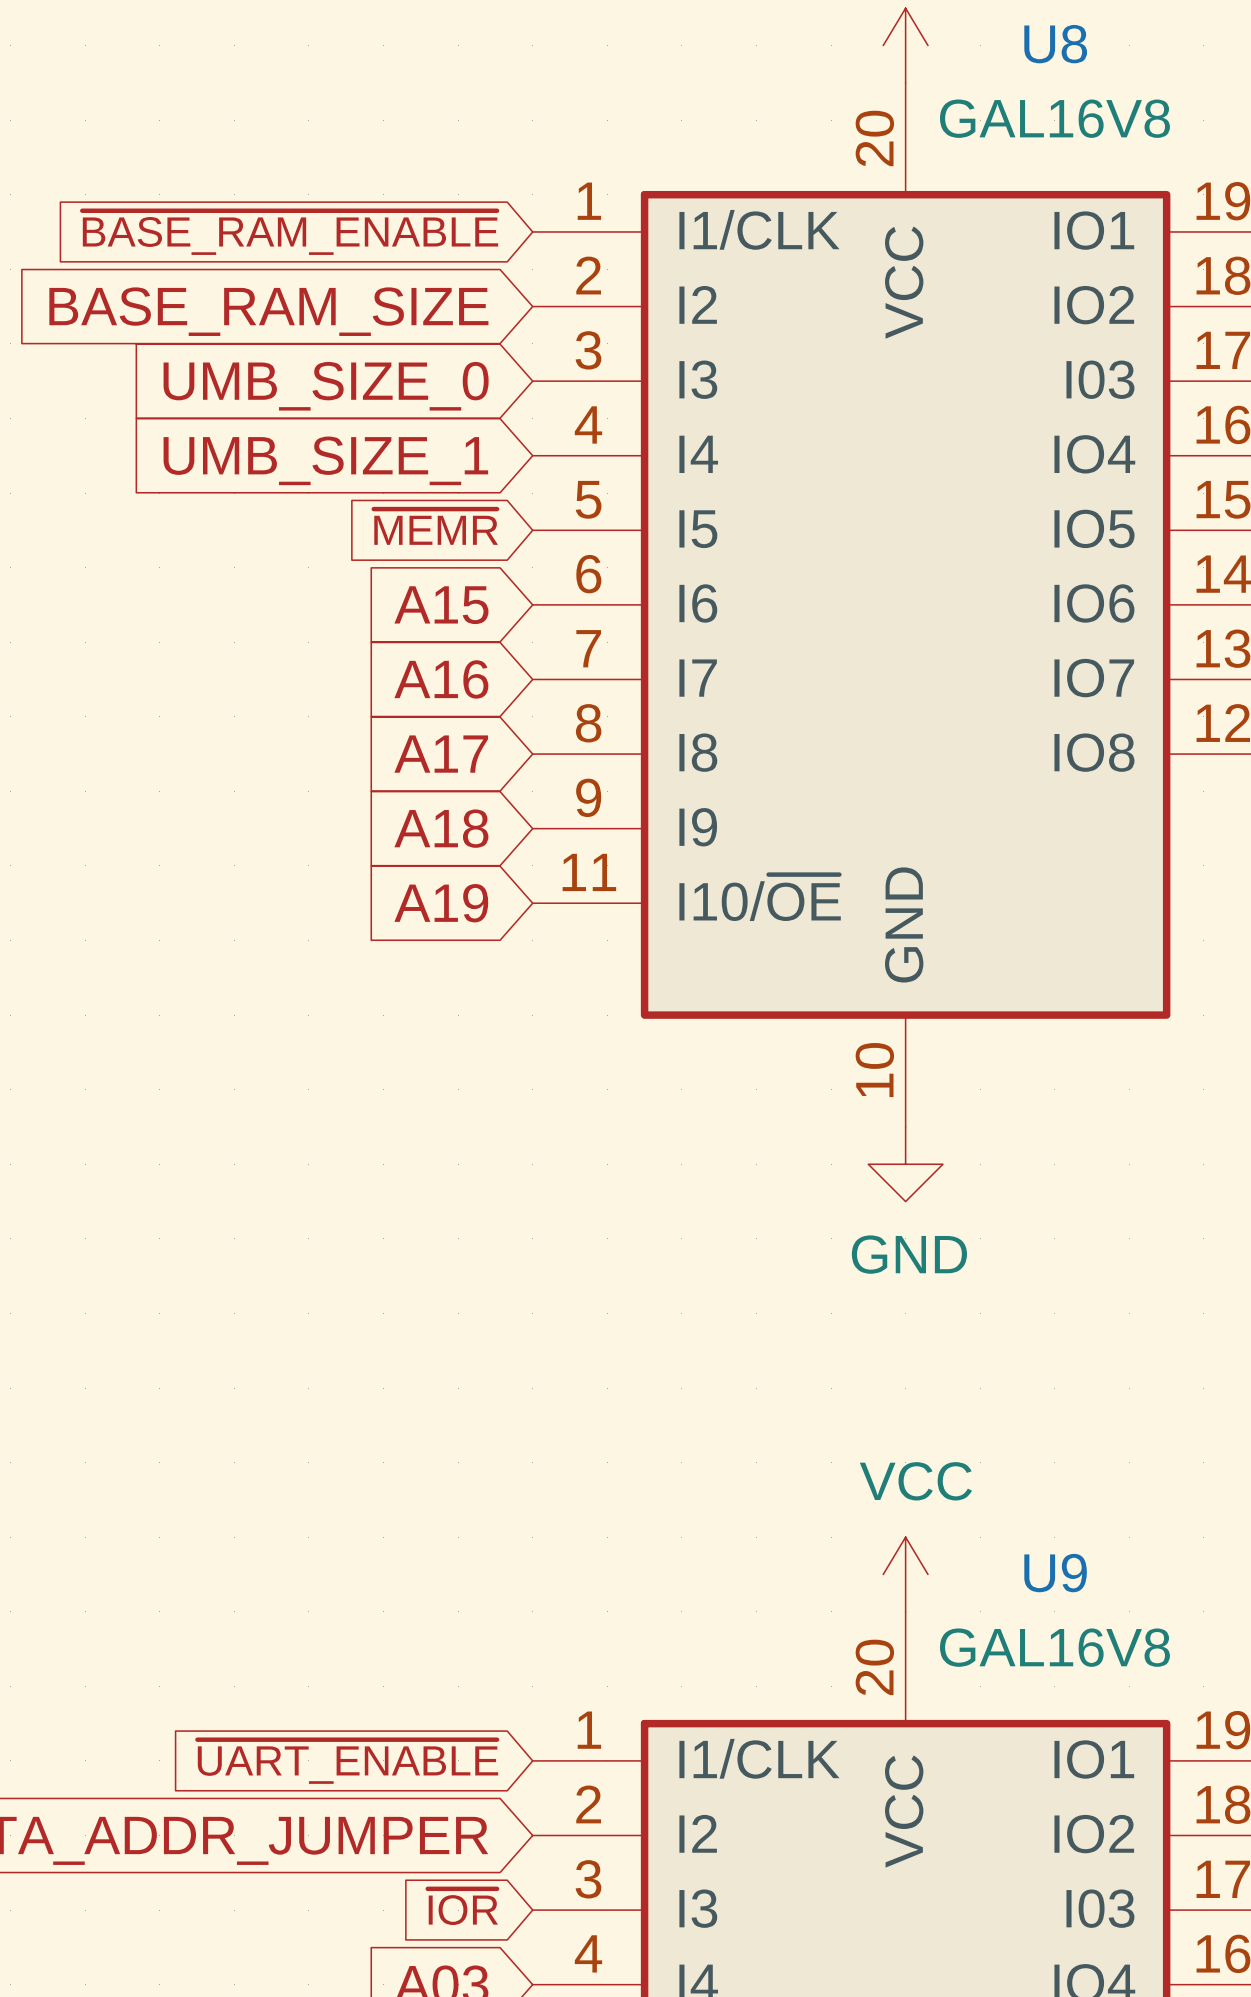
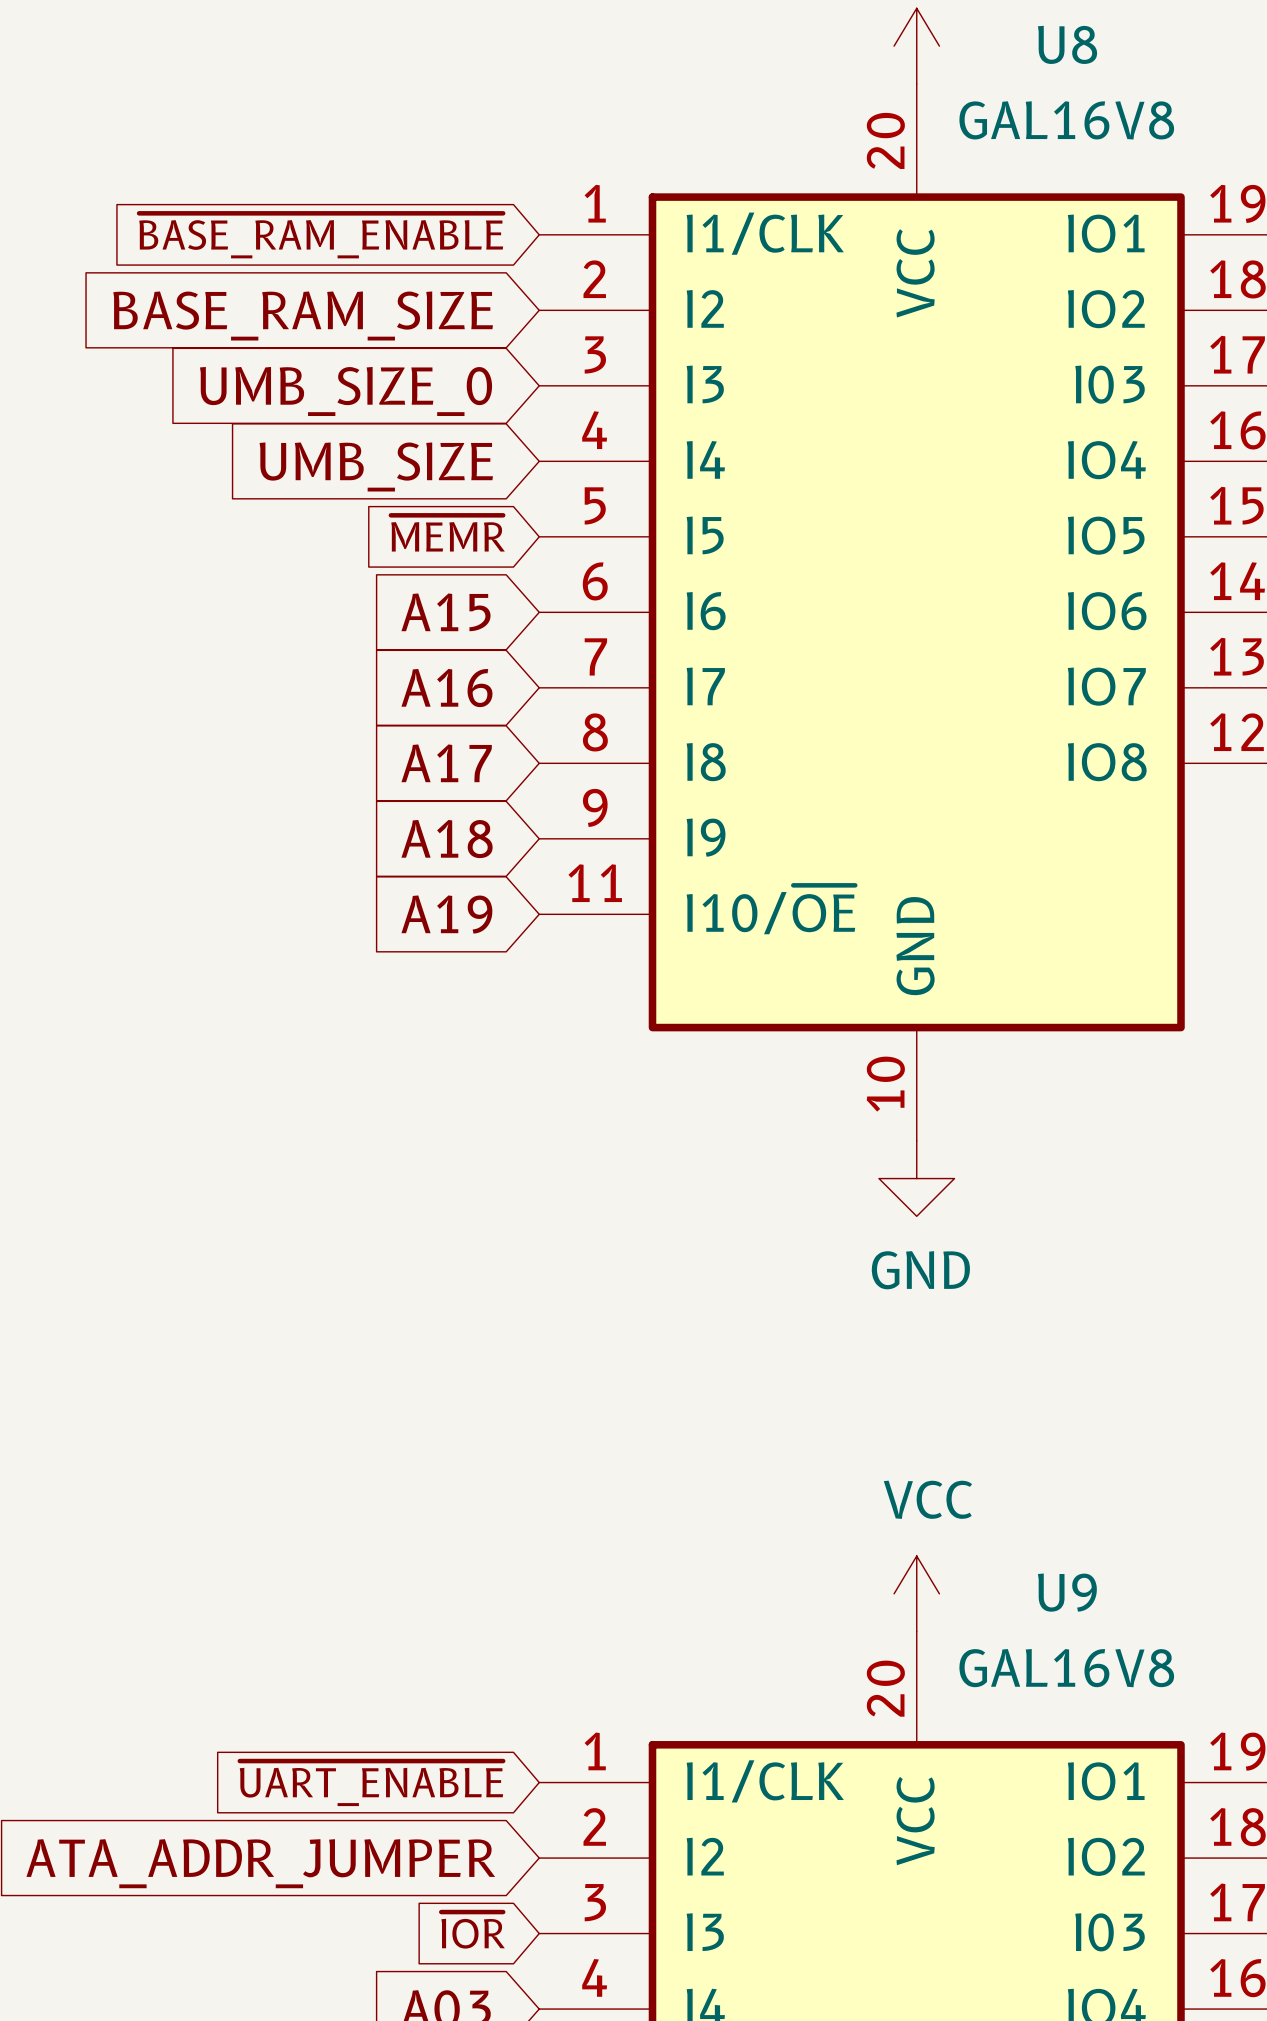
global label: UMB_SIZE_1 (325, 460) -> UMB_SIZE (376, 466)

